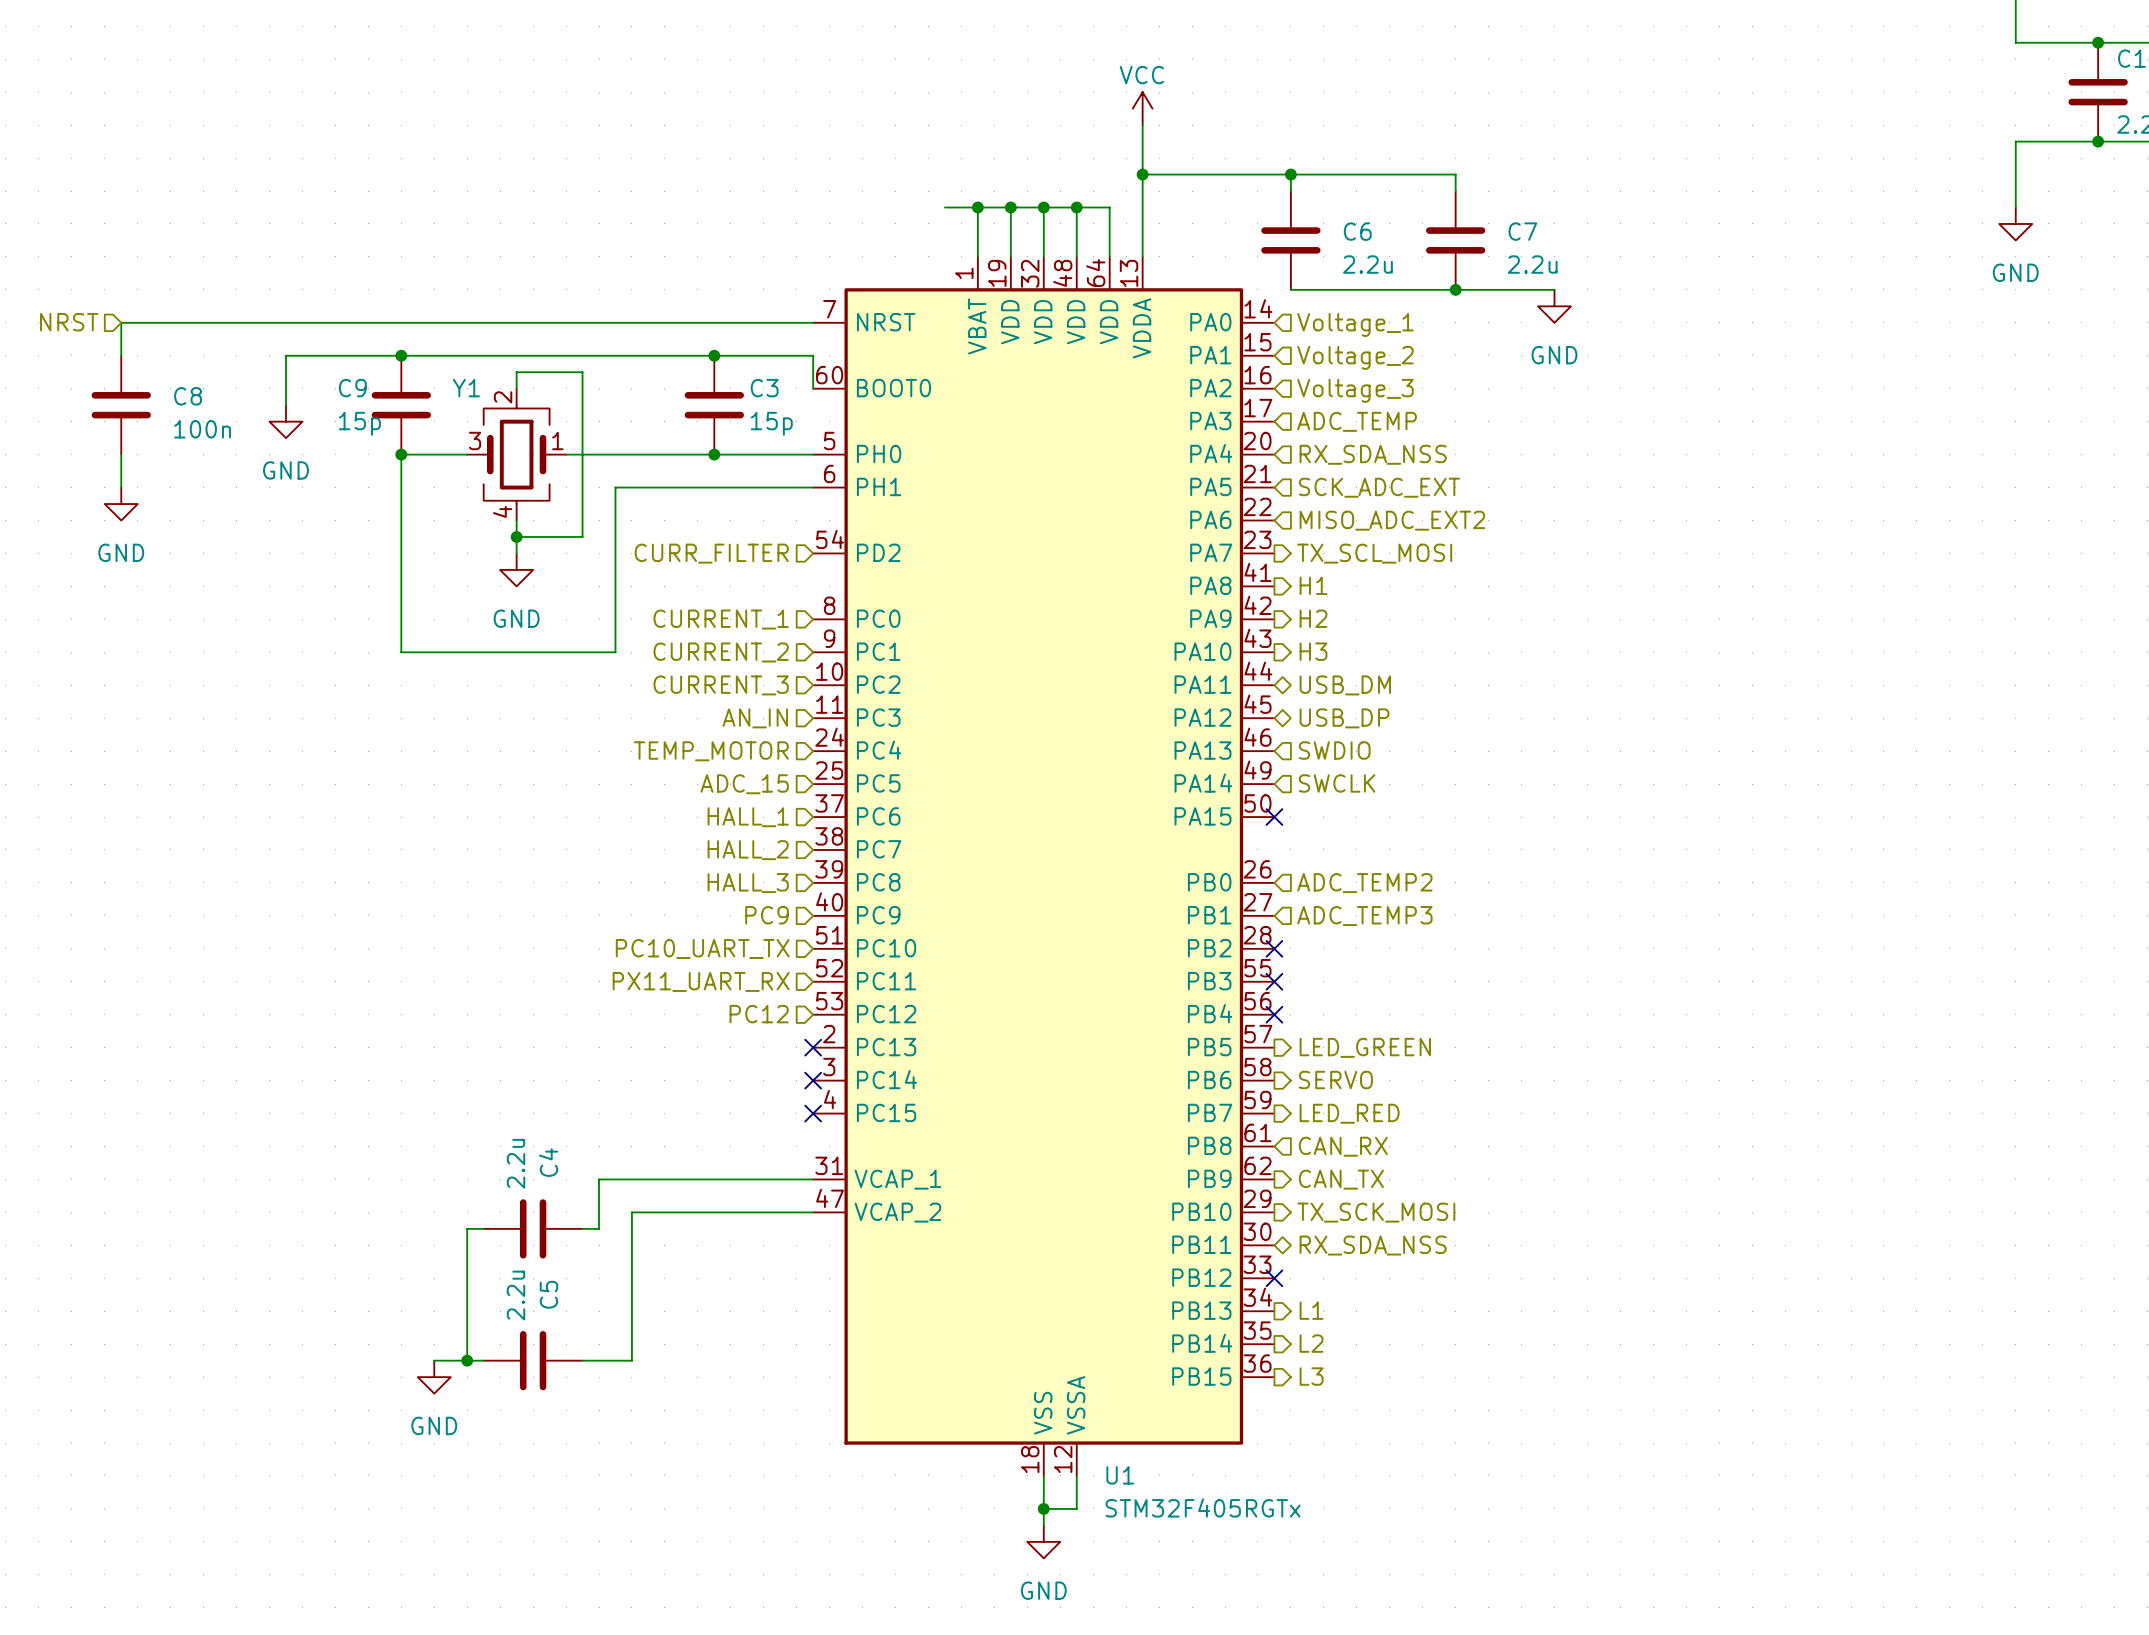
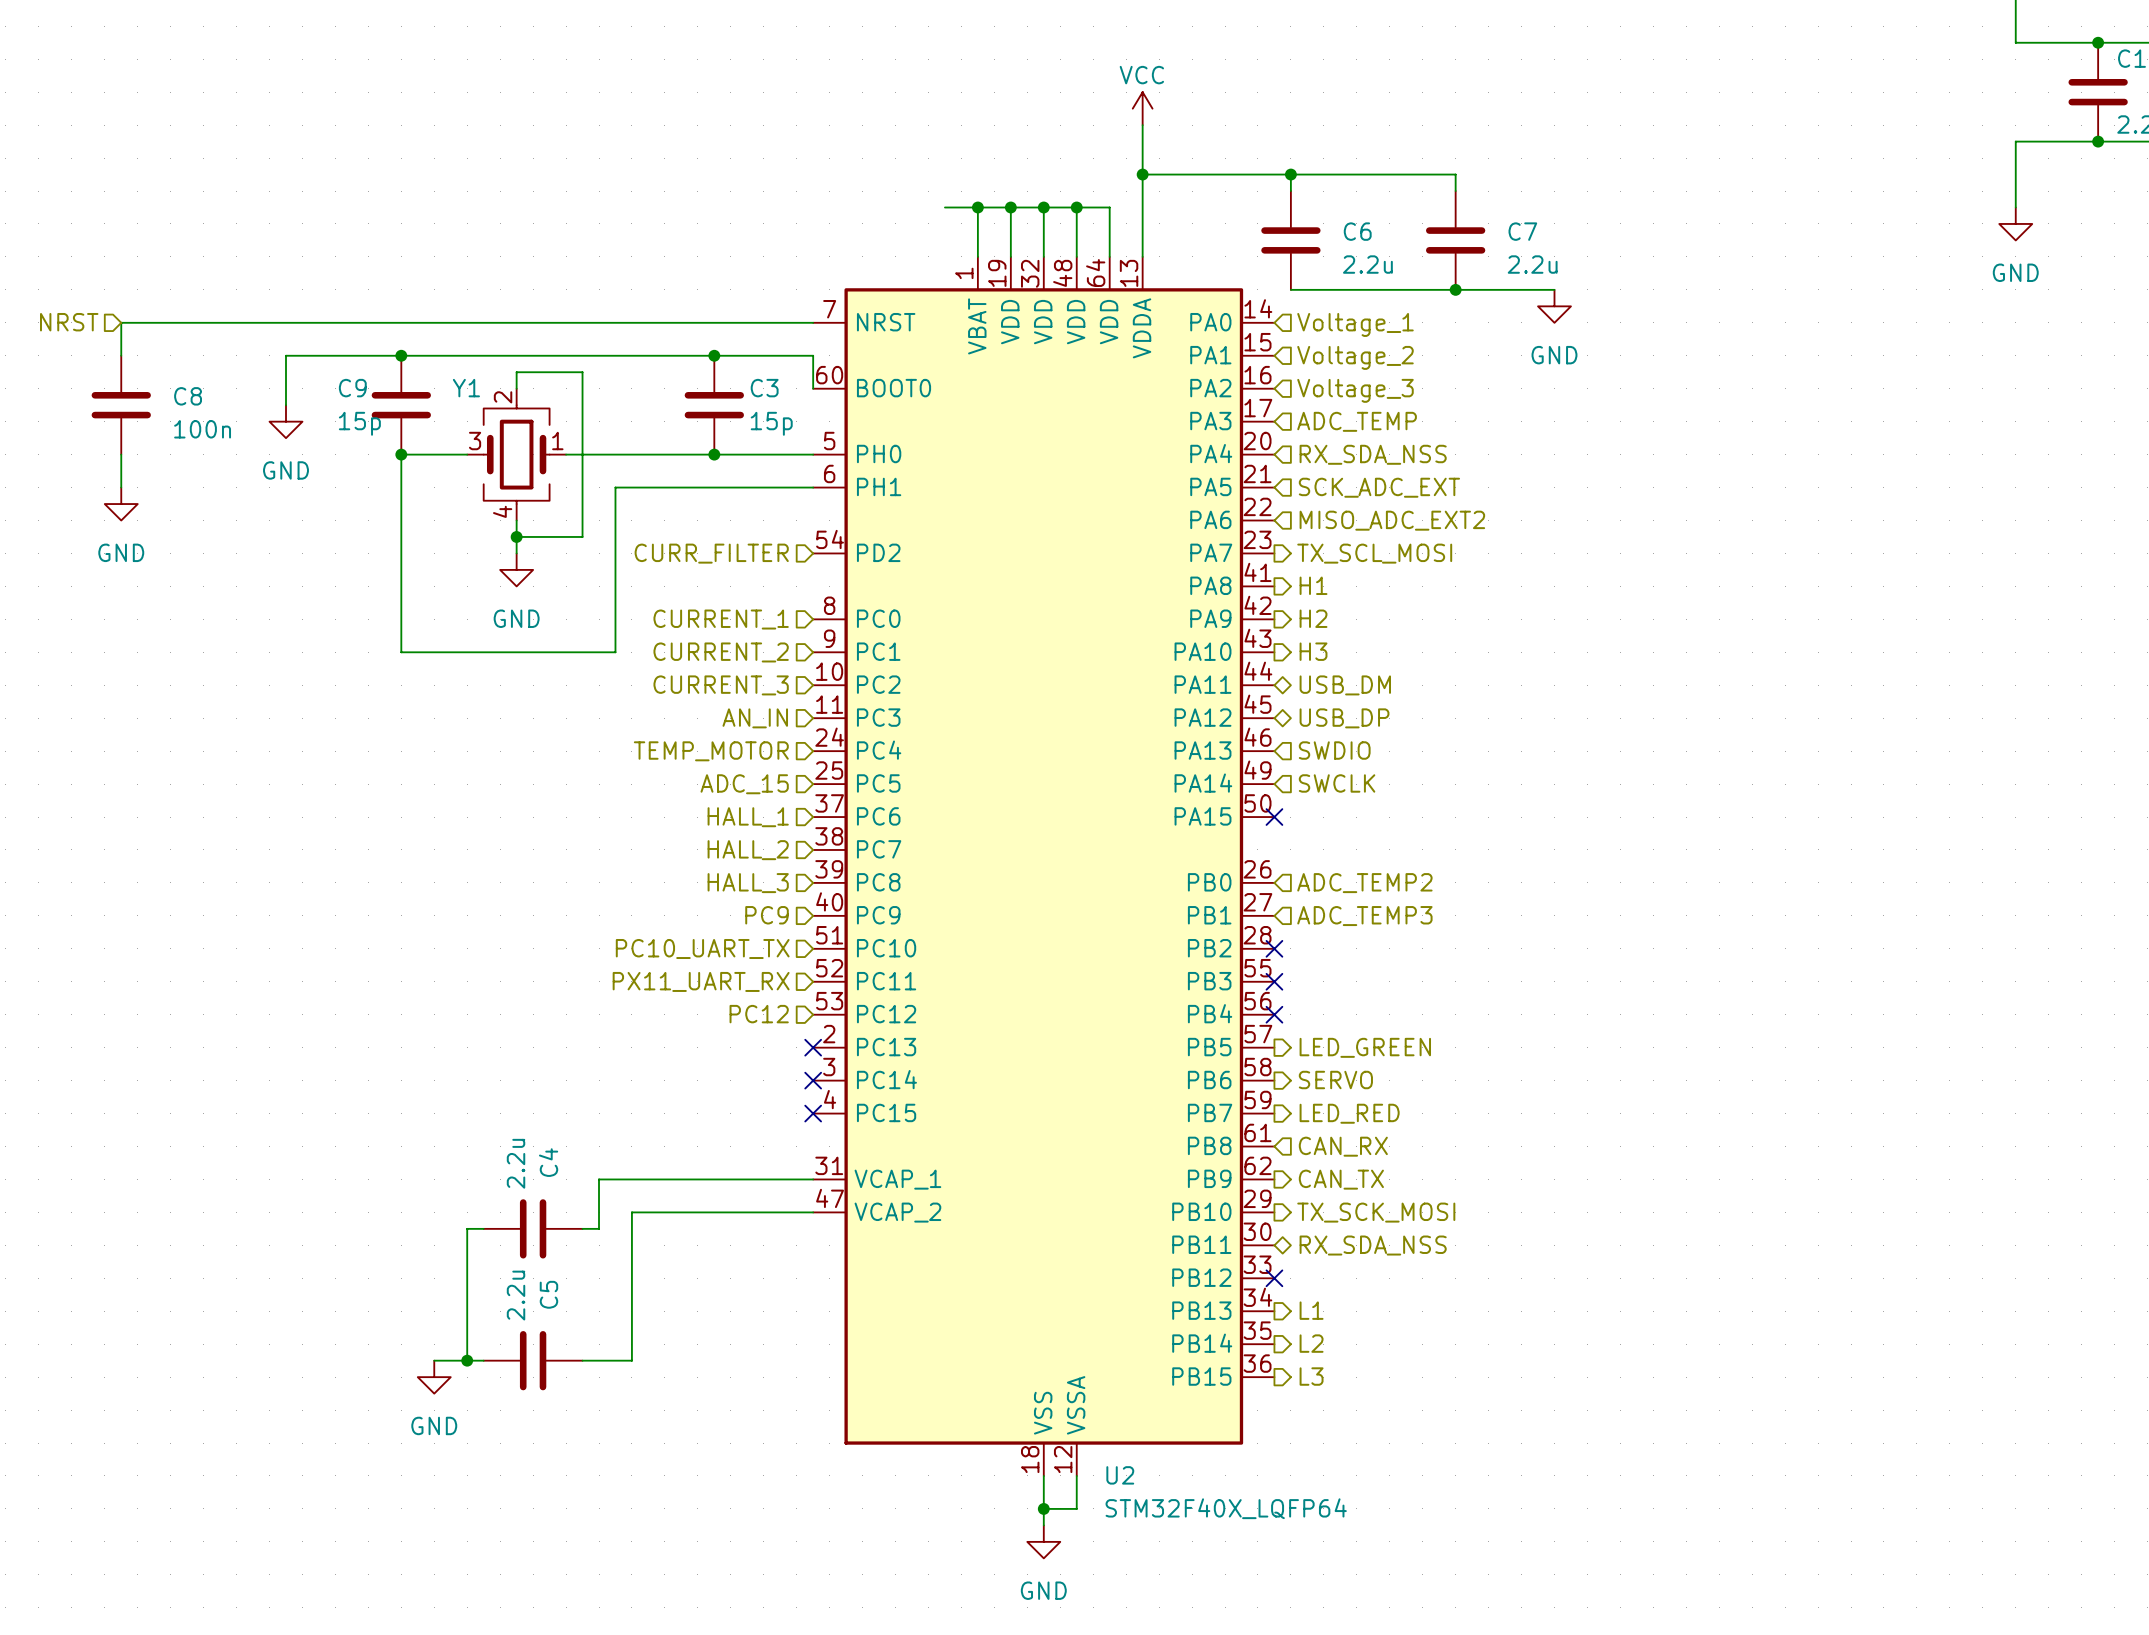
U1 name: U1 (1120, 1475) -> U2 (1120, 1475)
U1 value: STM32F405RGTx (1203, 1507) -> STM32F40X_LQFP64 (1226, 1508)

